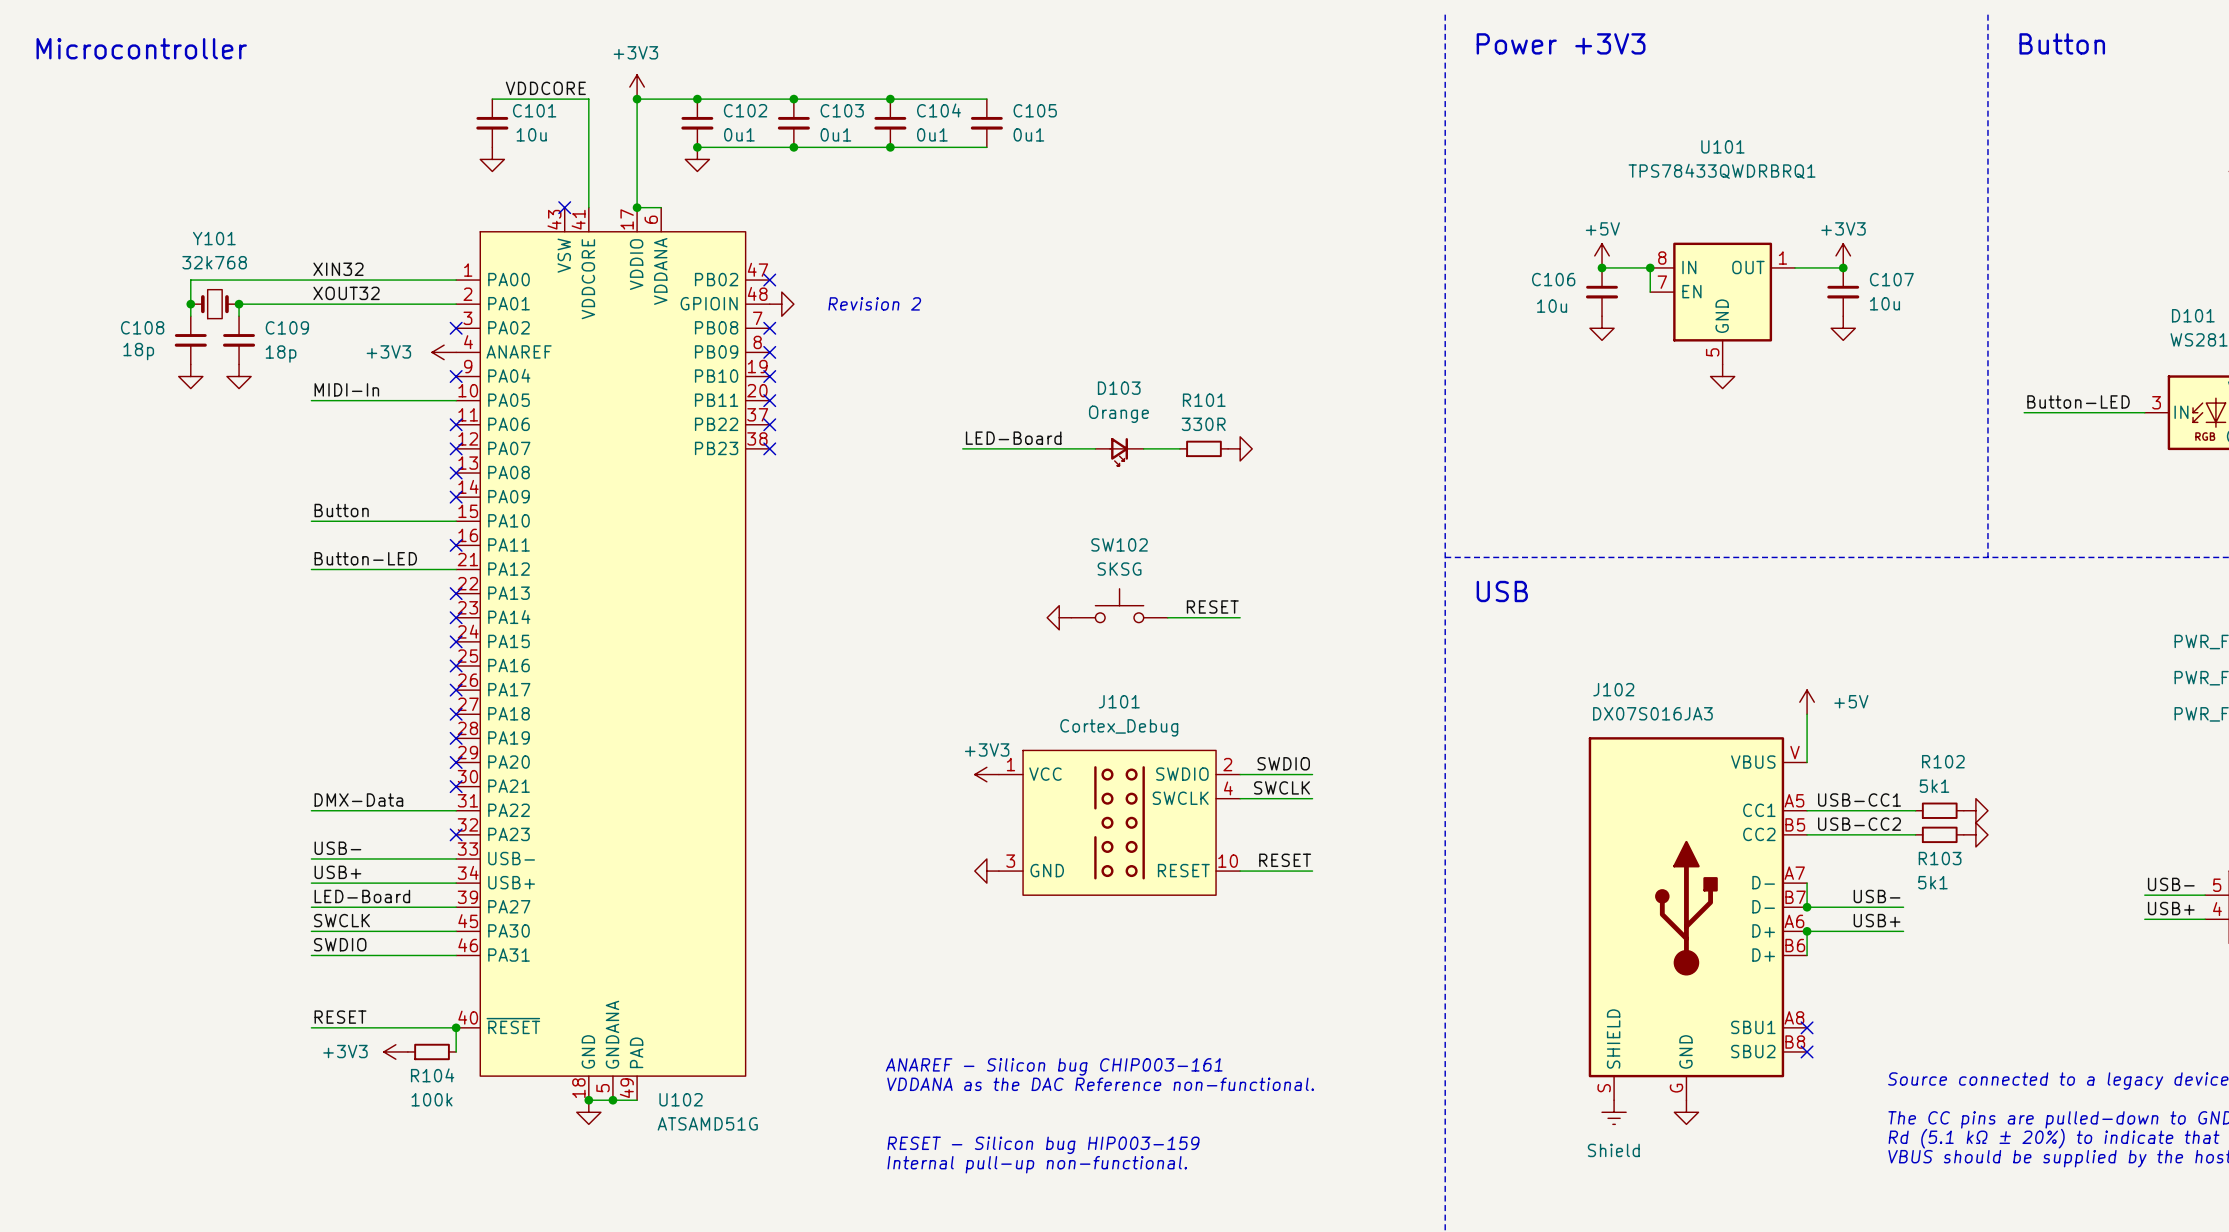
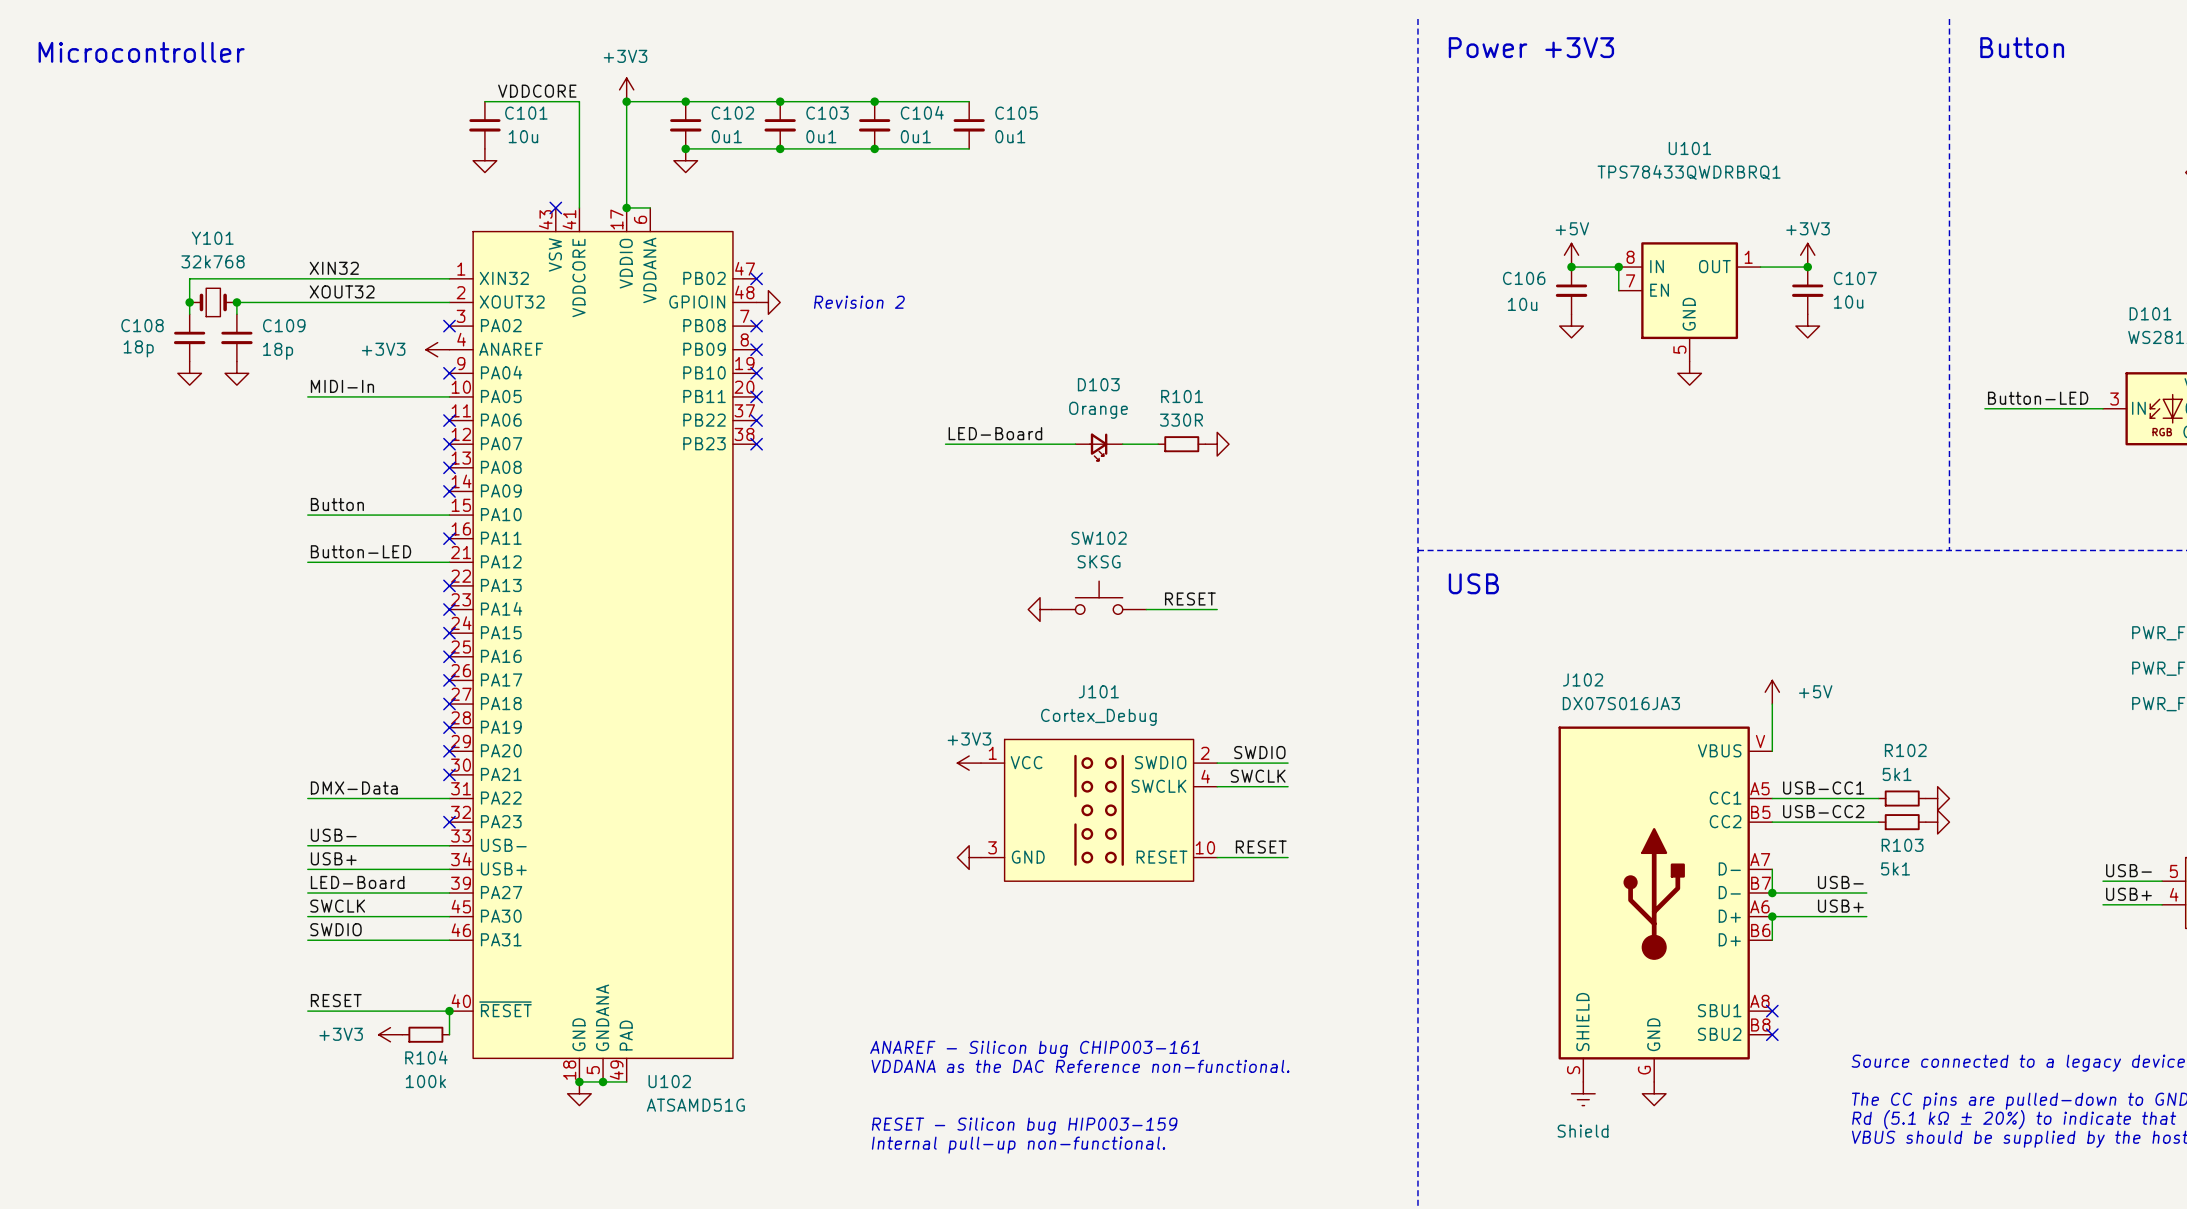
U102 pin name: PA00 (509, 279) -> XIN32 (504, 278)
U102 pin name: PA01 (509, 303) -> XOUT32 (512, 302)

